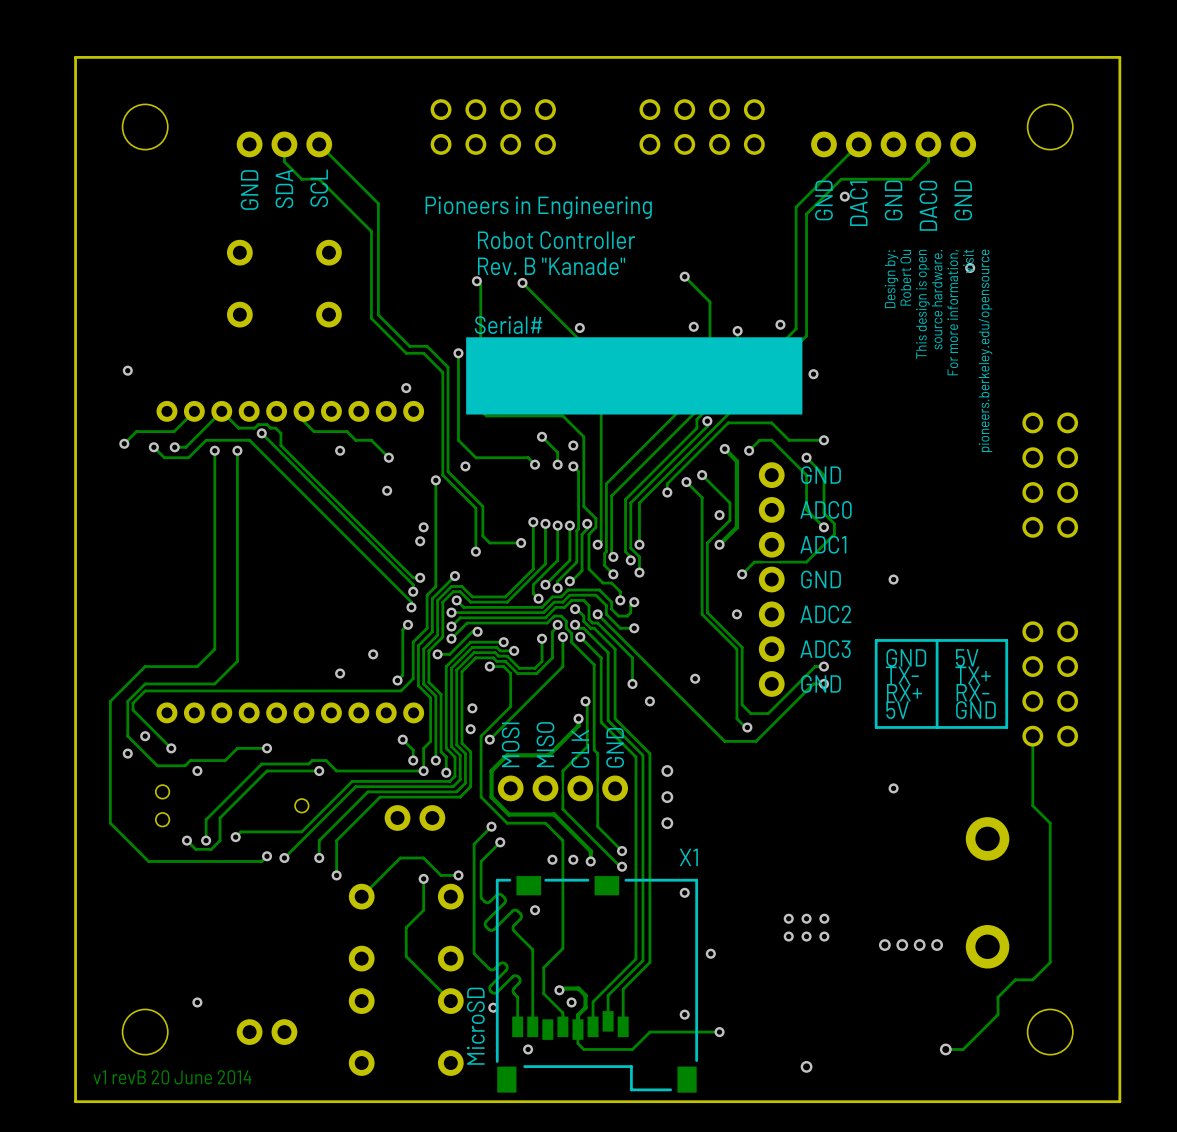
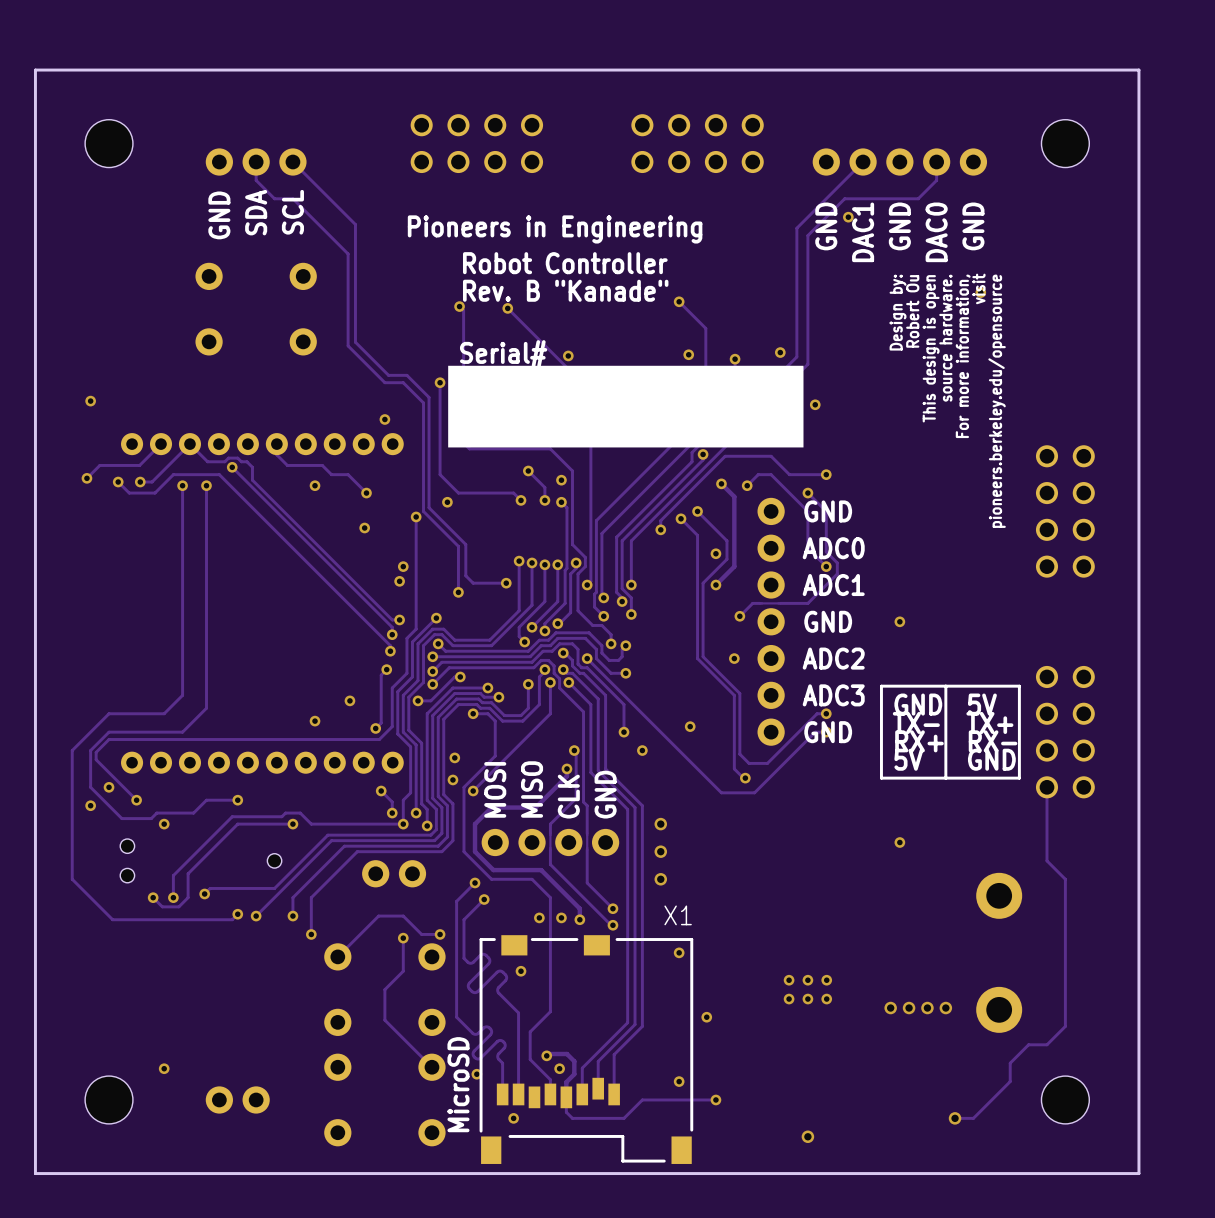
text: v1 revB 20 June 2014 (172, 1077) -> none

